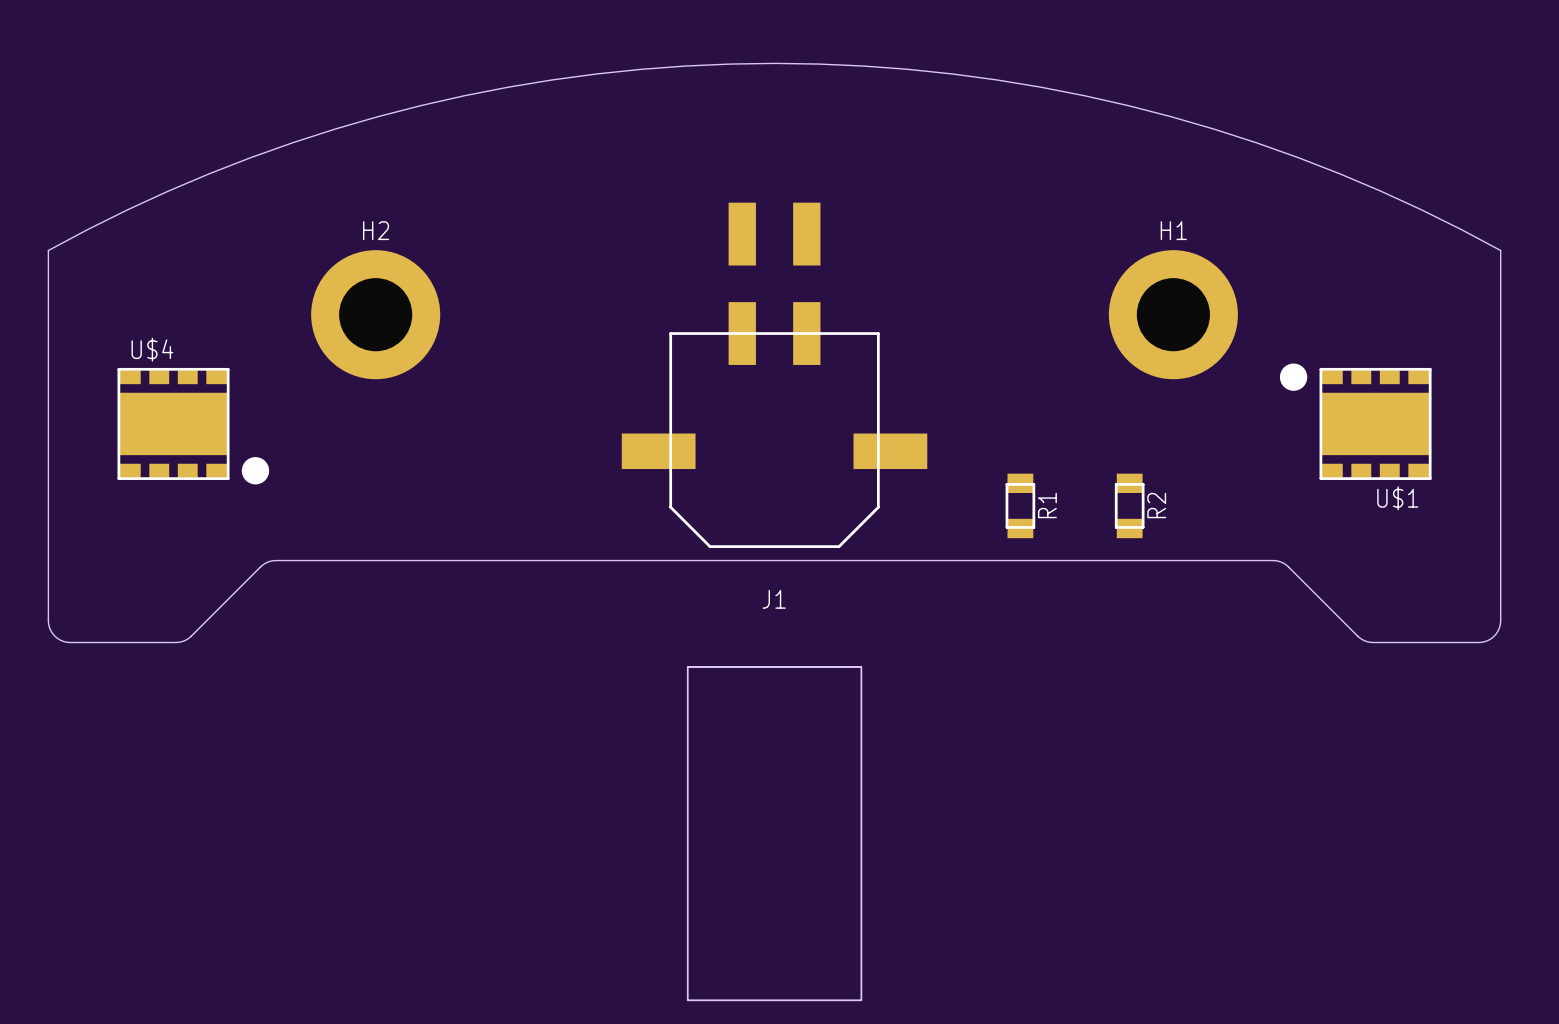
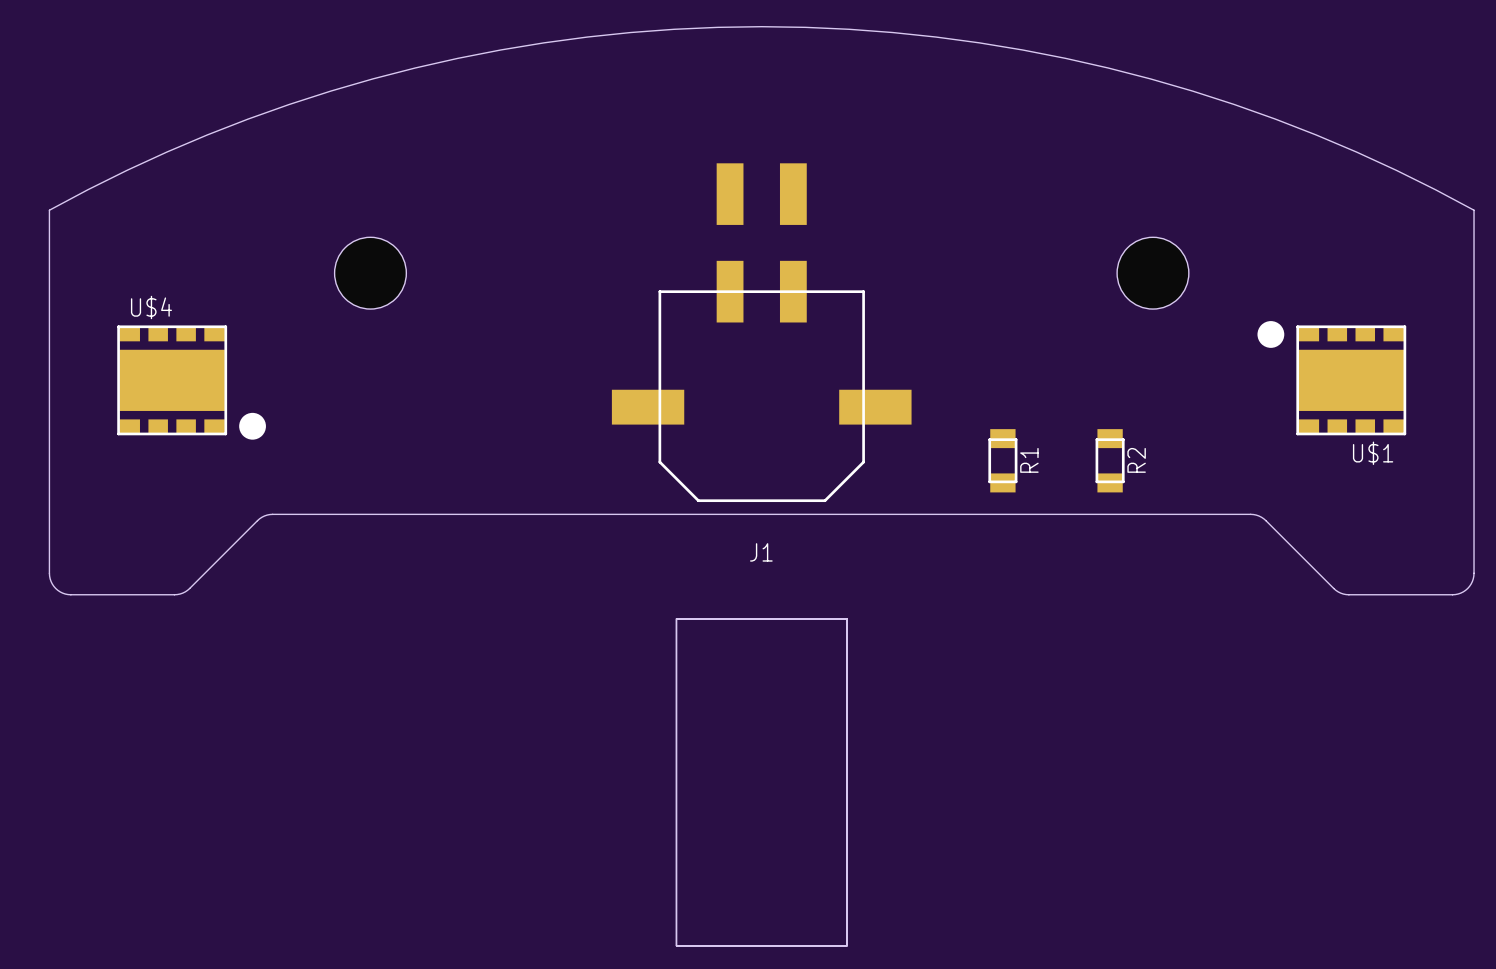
H2: (375, 314) -> none
part: none -> (370, 273)
H1: (1173, 314) -> none
part: none -> (1152, 273)

